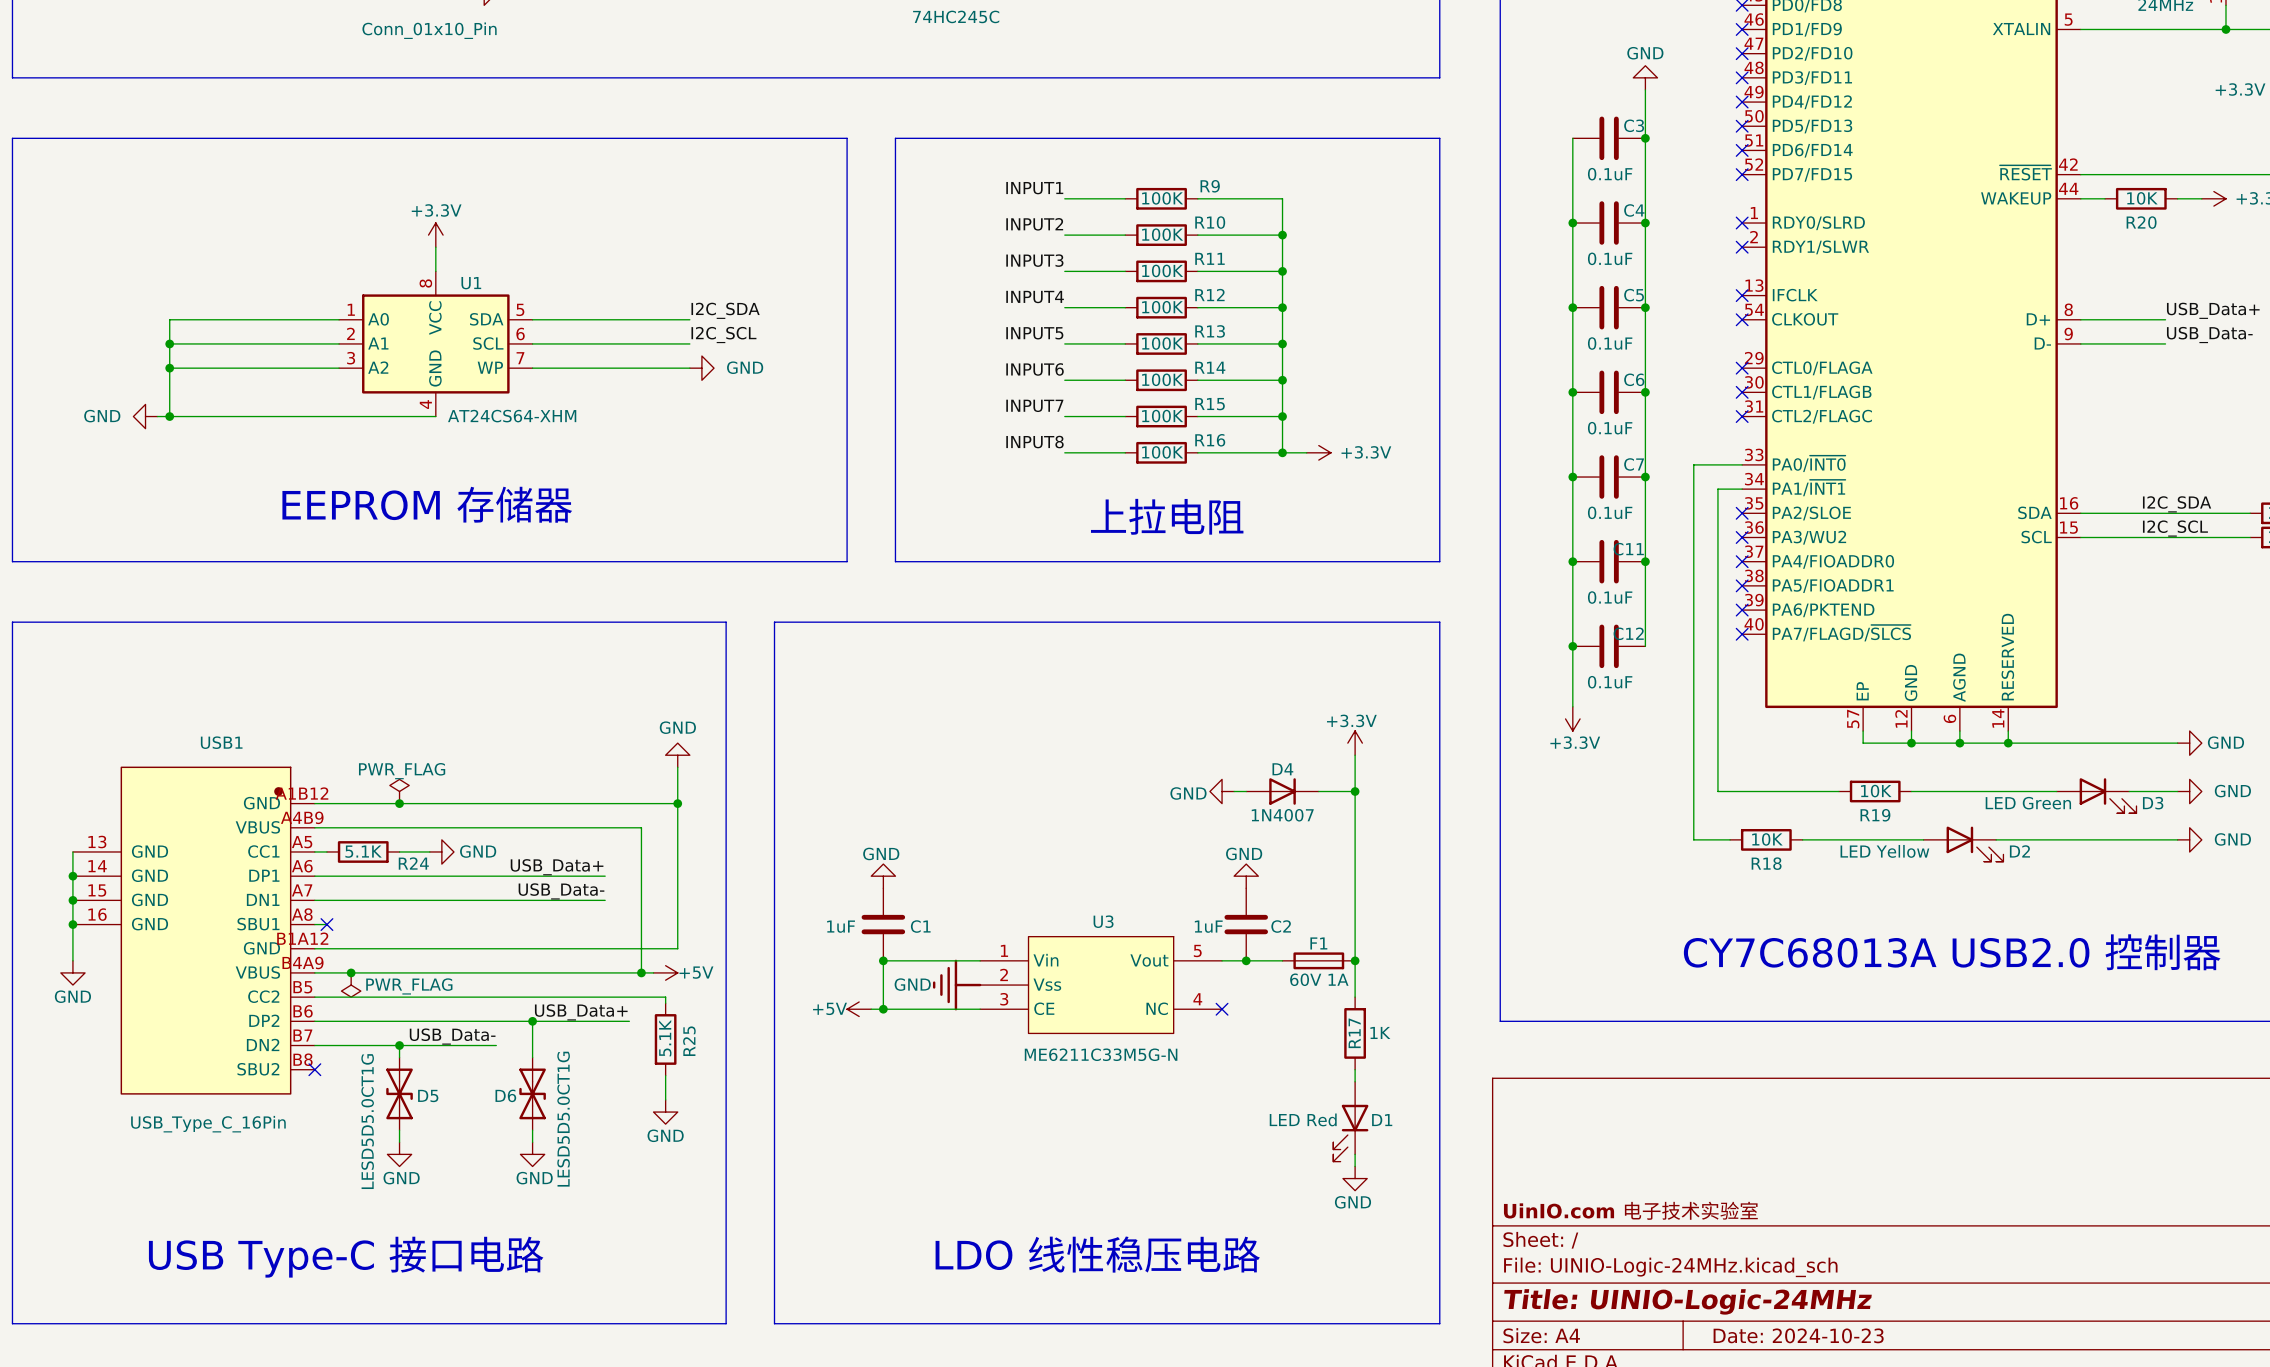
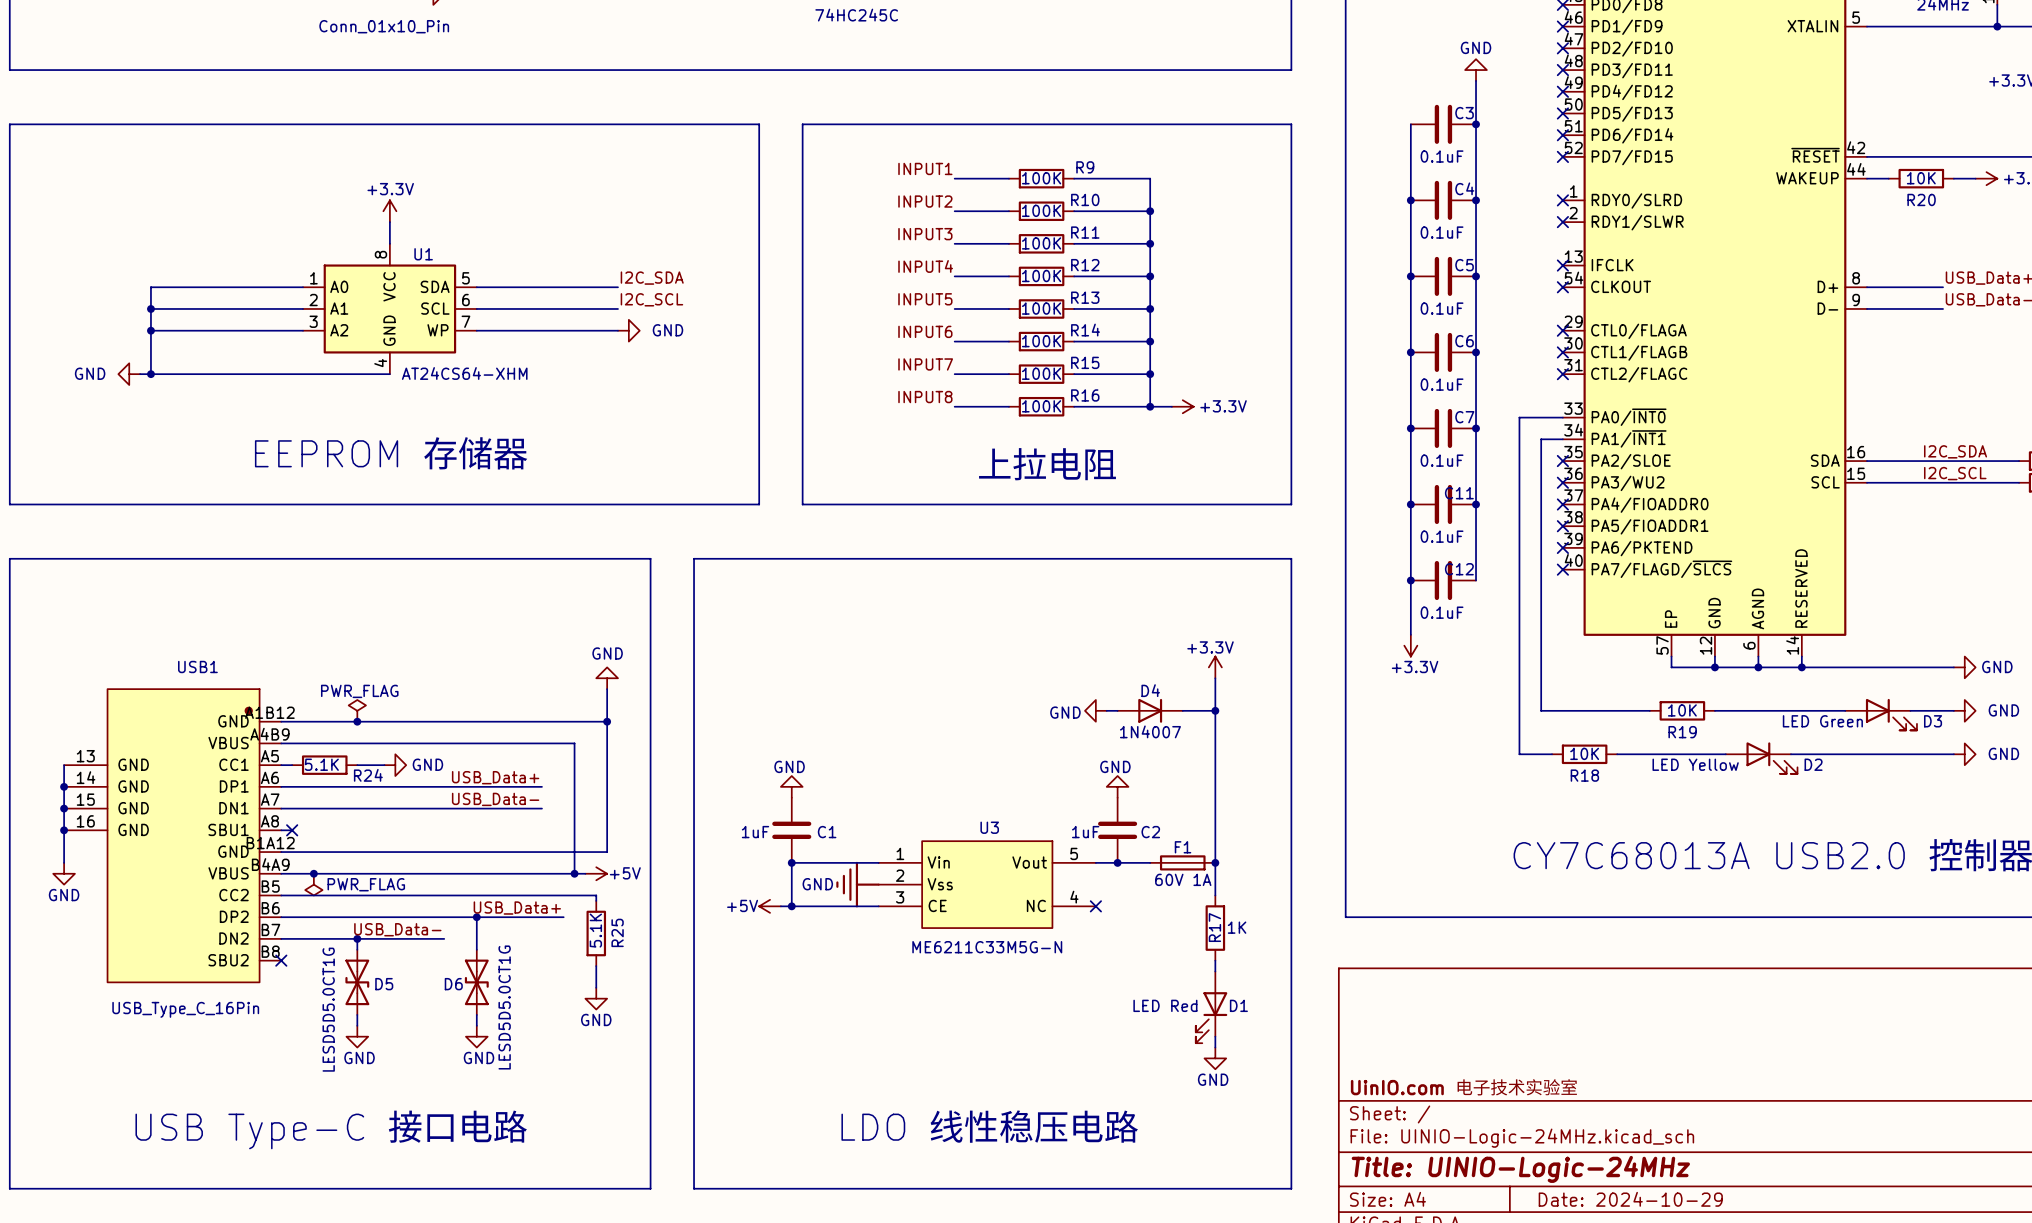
title block: Date: 2024-10-23 (1798, 1335) -> Date: 2024-10-29 (1630, 1199)

